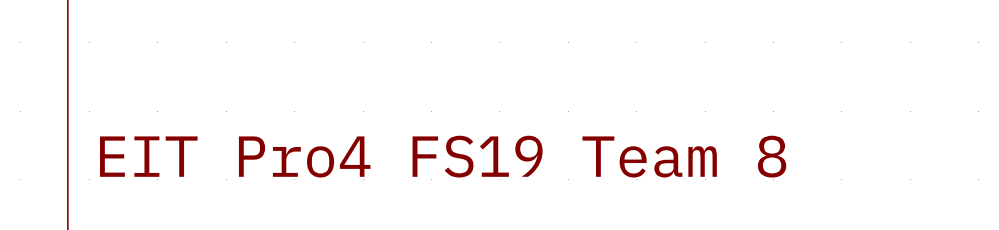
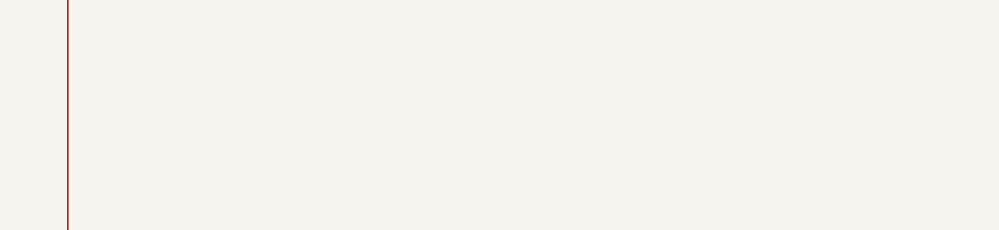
title block: EIT Pro4 FS19 Team 8 (443, 156) -> none

